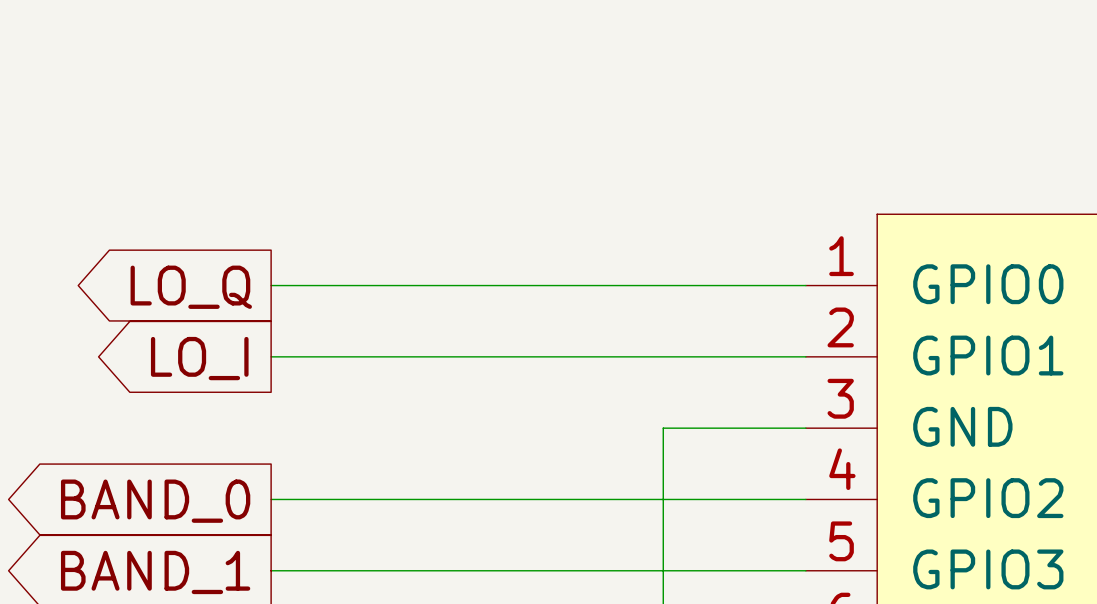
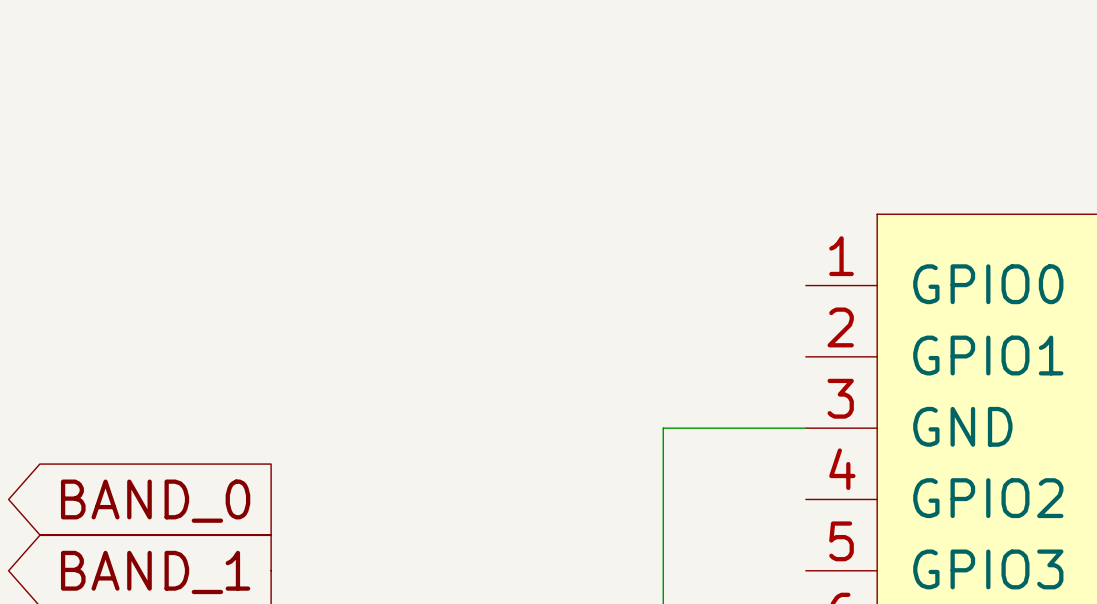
wire: (271, 285) (805, 285) -> none
global label: LO_Q (191, 287) -> none
wire: (271, 356) (805, 356) -> none
global label: LO_I (199, 358) -> none
wire: (271, 499) (805, 499) -> none
wire: (271, 570) (805, 570) -> none

